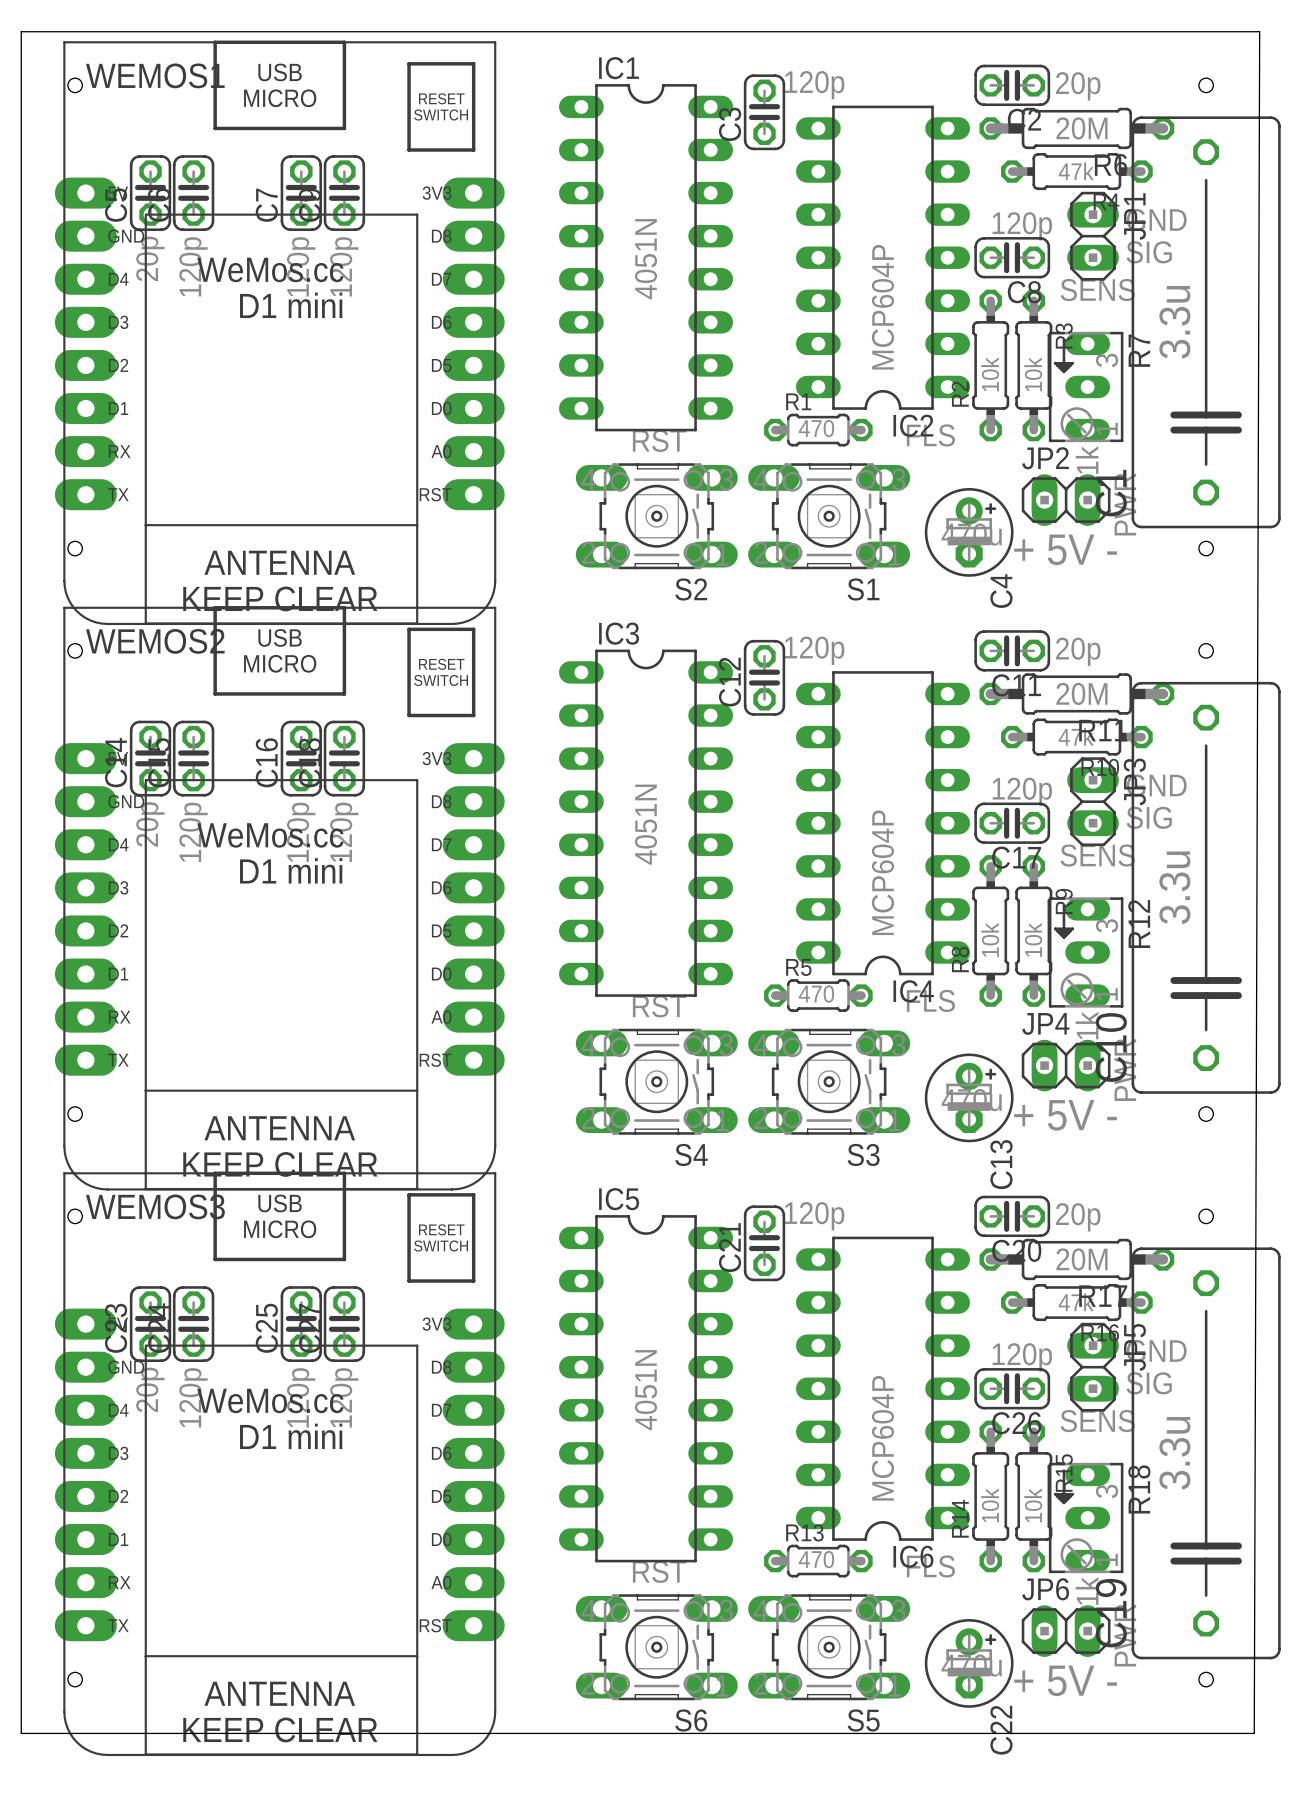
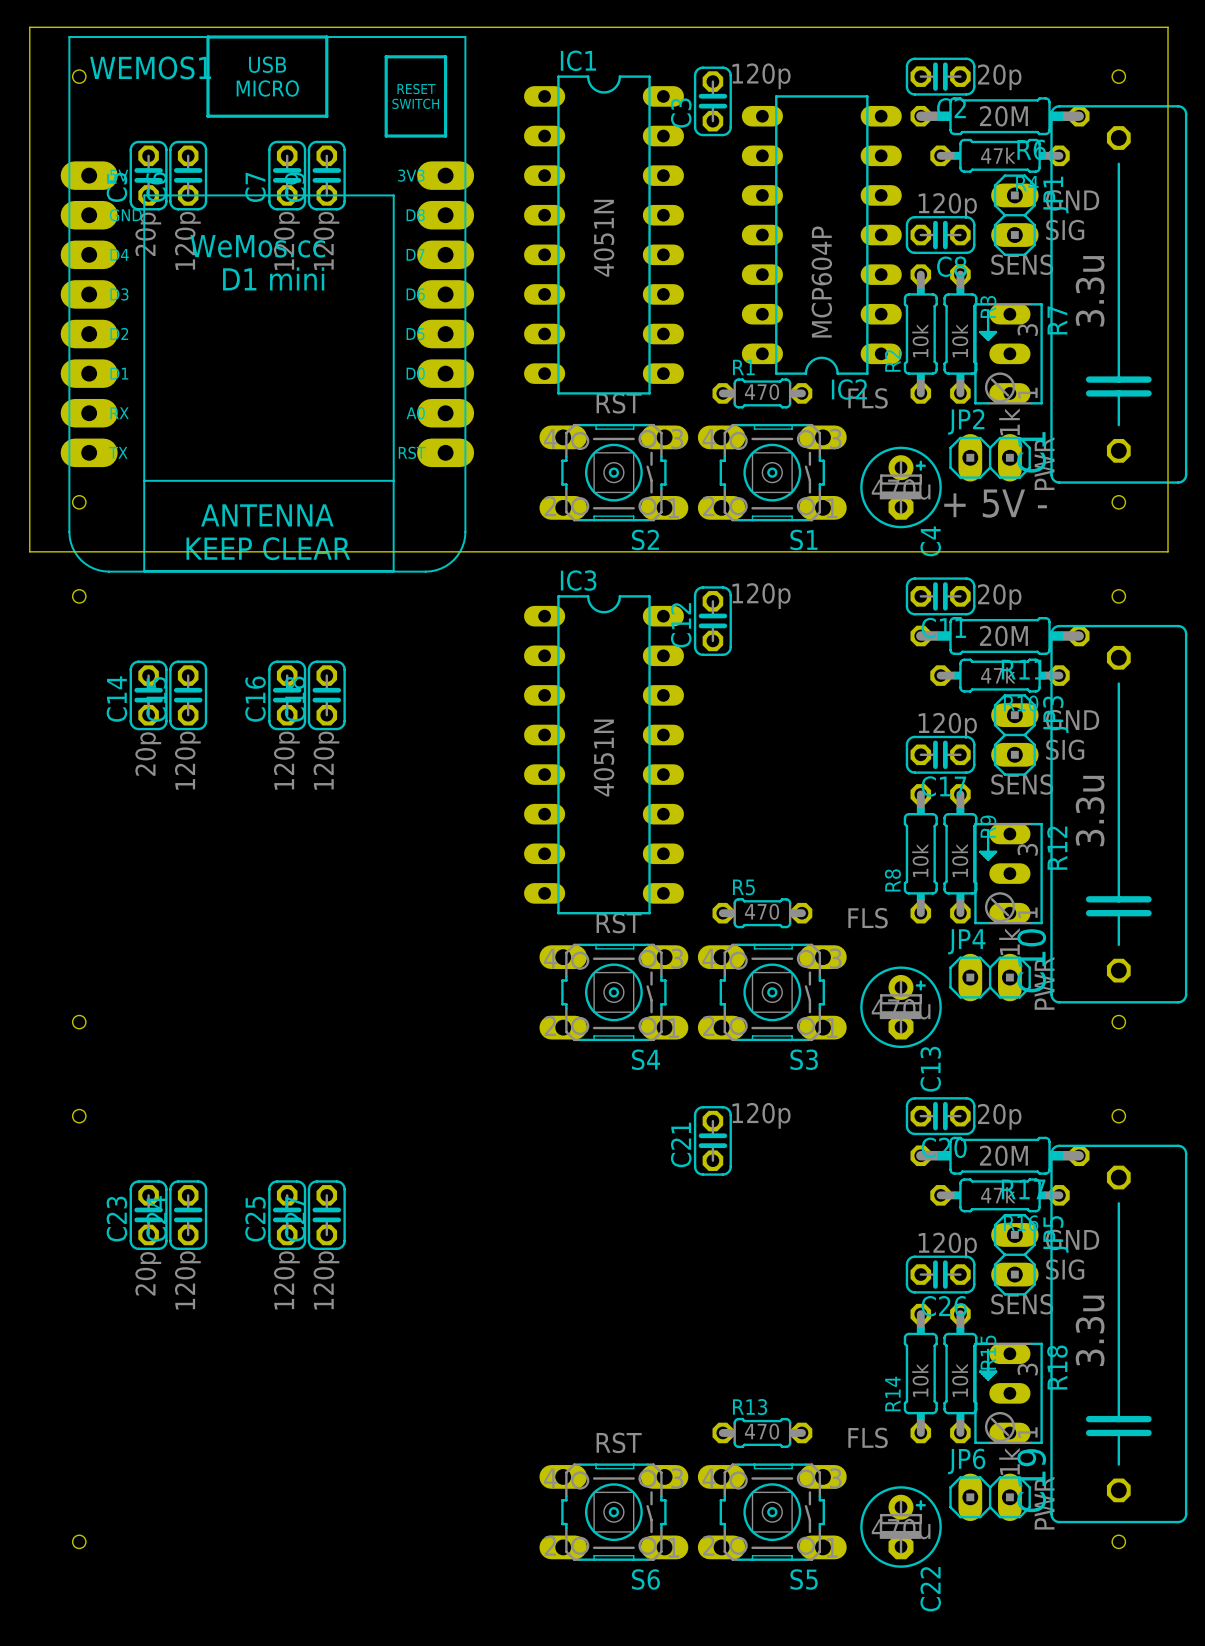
board edge: (1259, 31) (1254, 1733) (21, 1733) (21, 602) -> (1168, 27) (1168, 551) (29, 551)
IC4: MCP604P (882, 823) -> none
WEMOS2: (279, 898) -> none
text: + 5V - (1065, 1115) -> none
IC5: 4051N (646, 1388) -> none
IC6: MCP604P (882, 1388) -> none
WEMOS3: (279, 1463) -> none
text: + 5V - (1065, 1680) -> none

